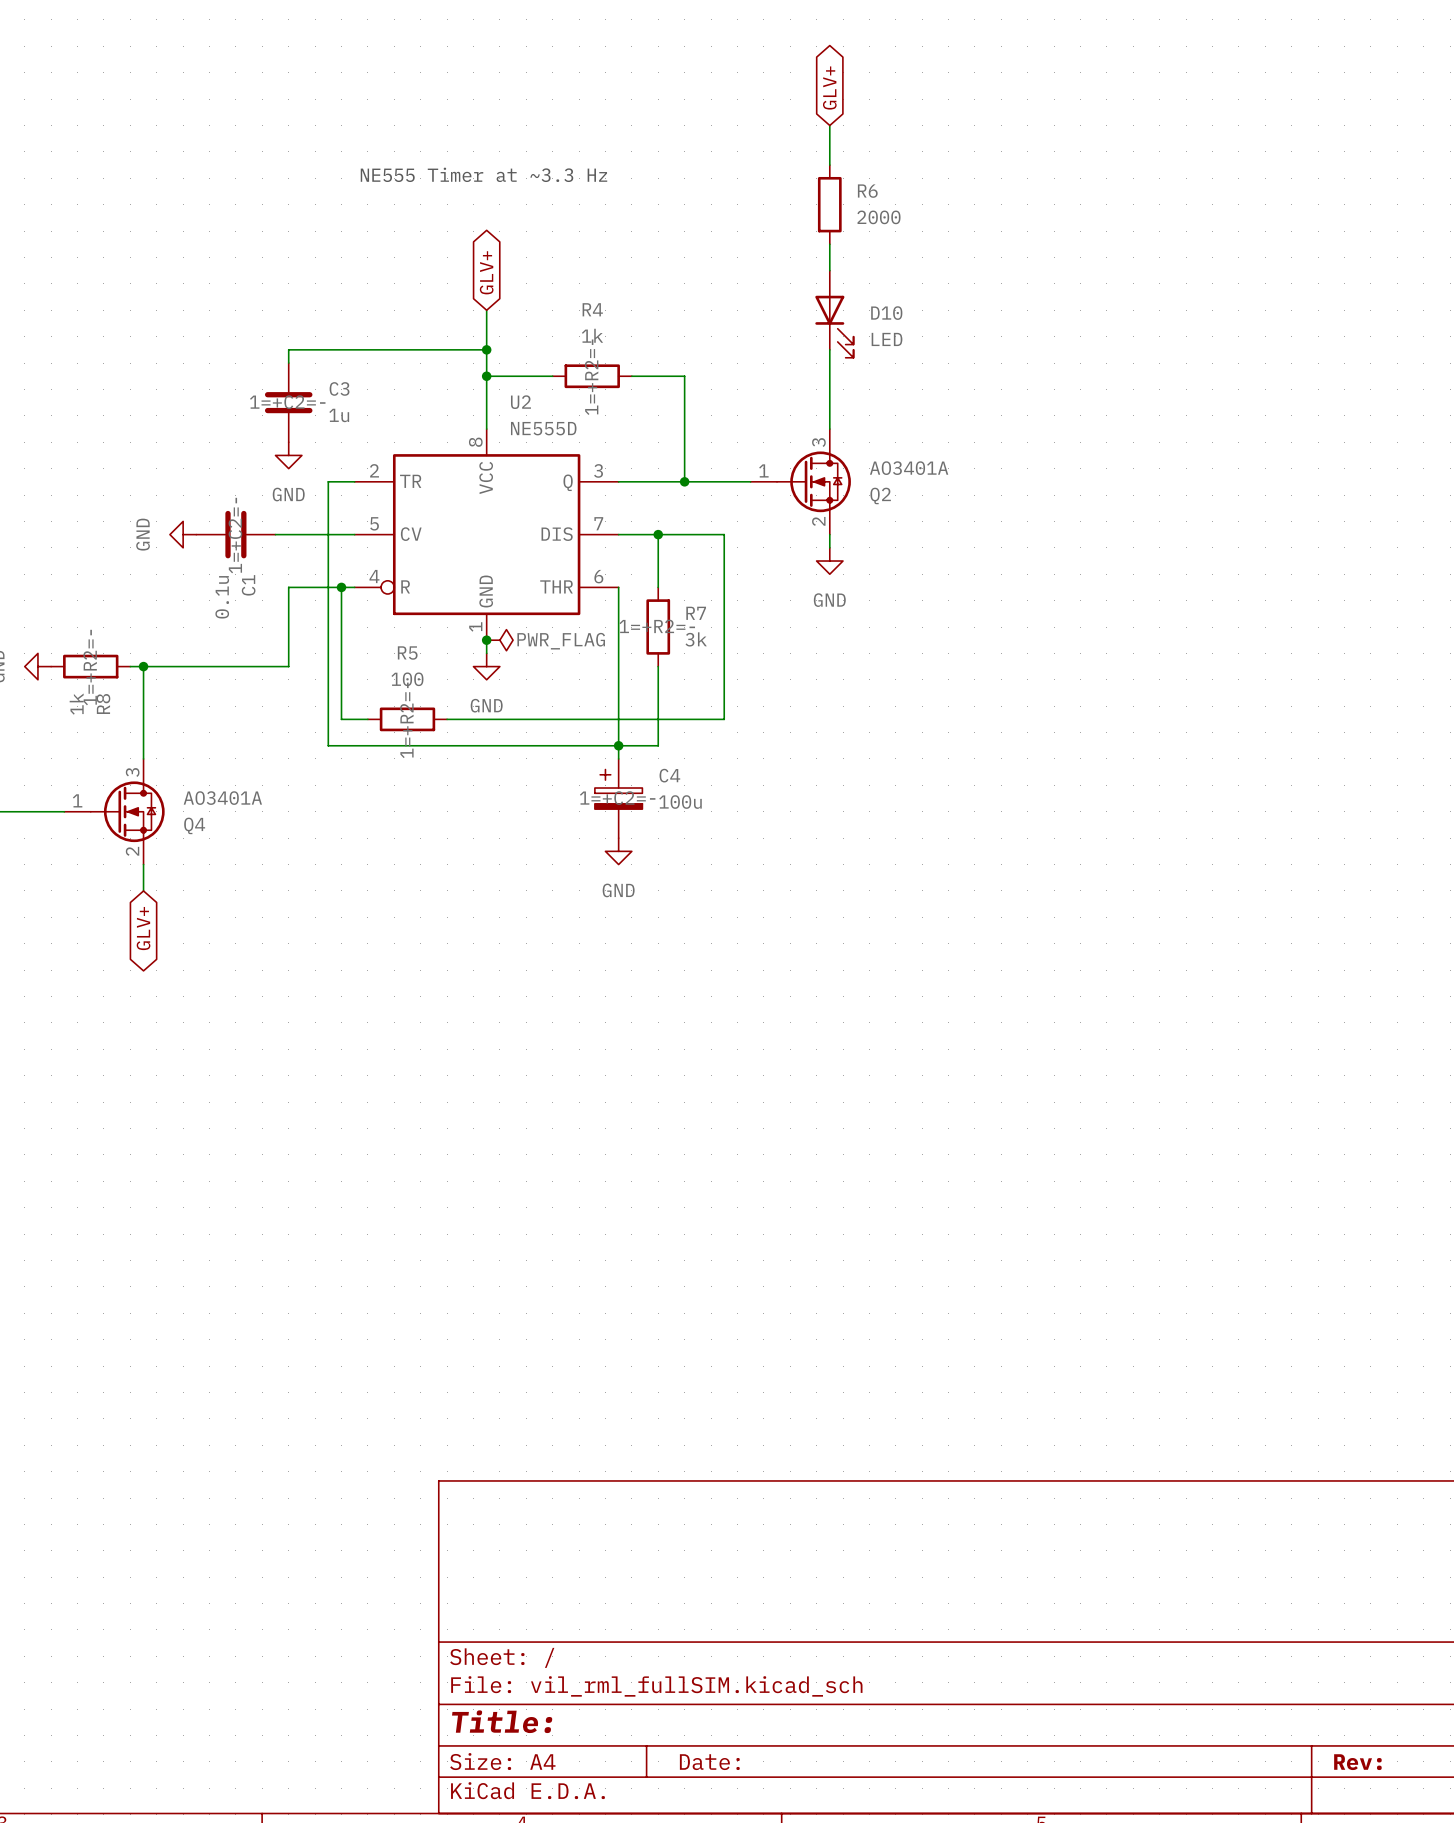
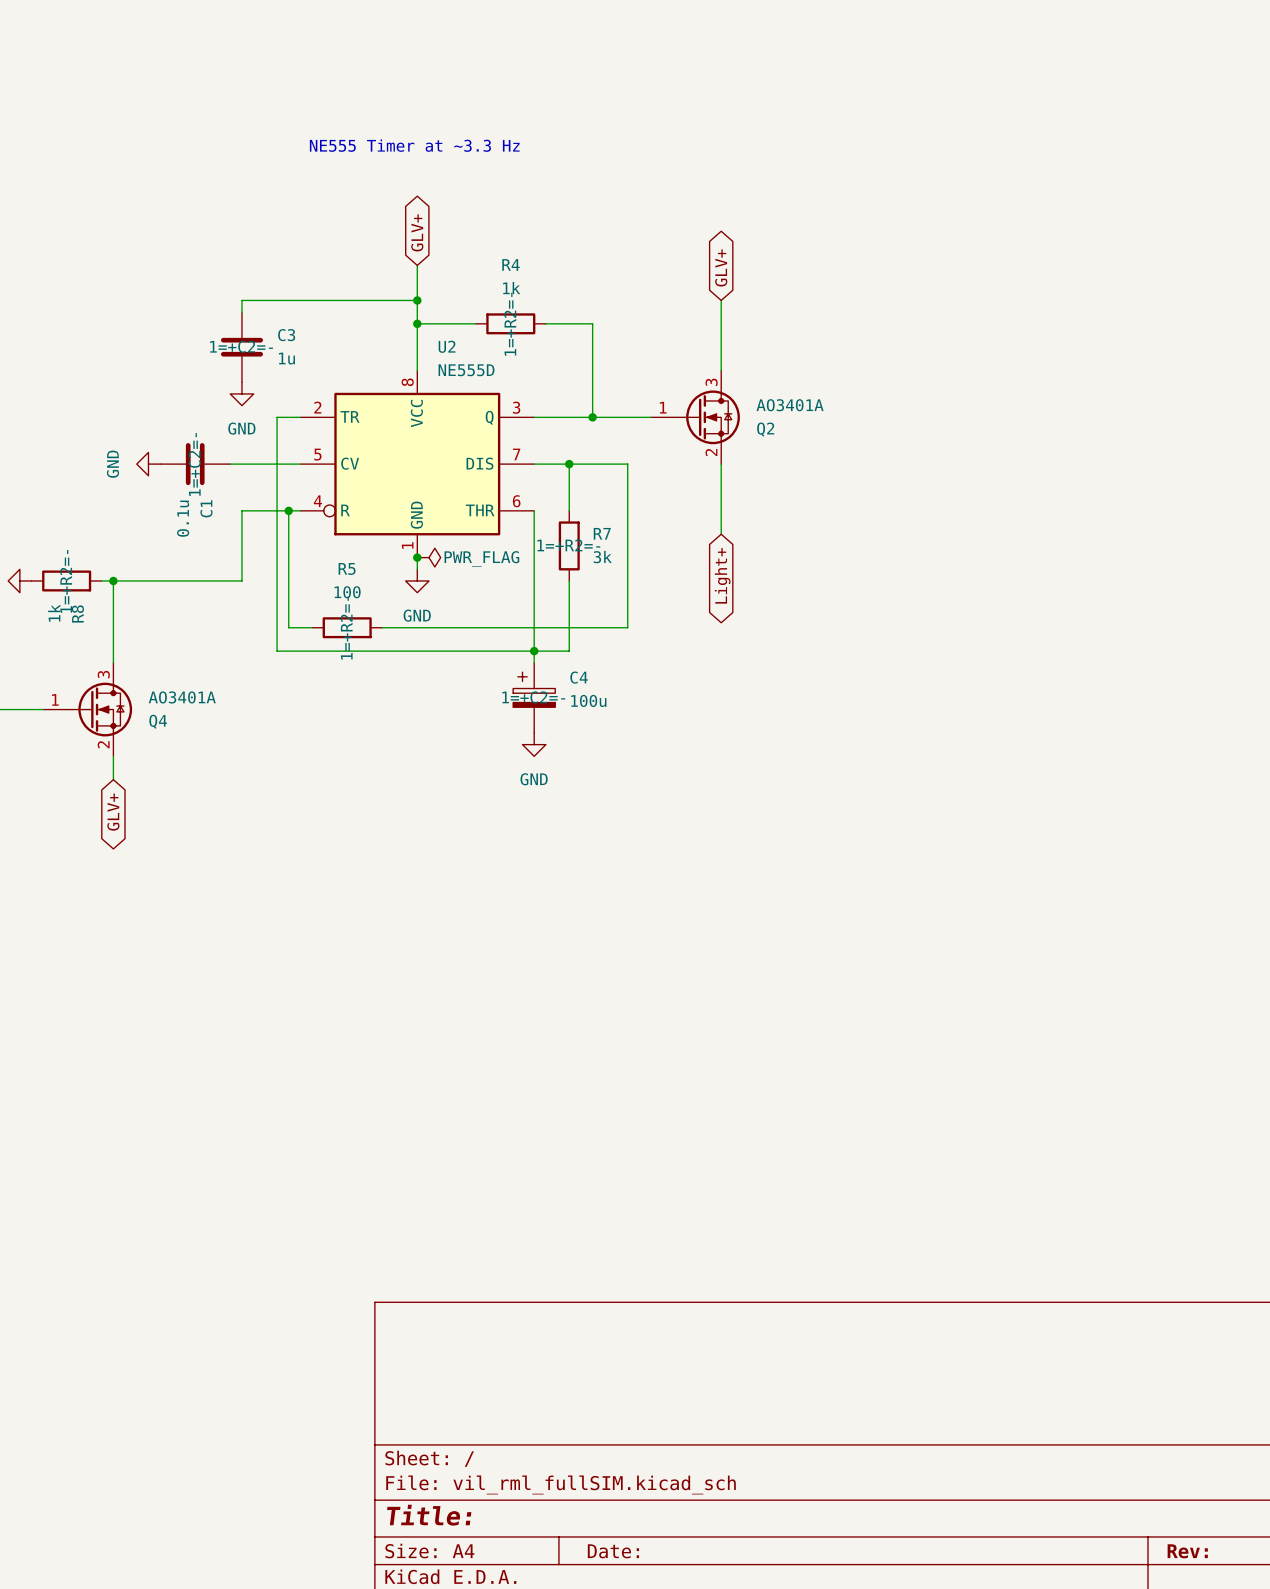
global label position: GLV+ (829, 88) -> GLV+ (721, 267)
wire: (829, 125) (829, 165) -> none
R6: 2000 (829, 204) -> none
wire: (829, 244) (829, 270) -> none
D10: LED (834, 314) -> none
wire: none -> (721, 475) (721, 534)
power symbol: GND (829, 561) -> none
global label: none -> Light+ (722, 575)

